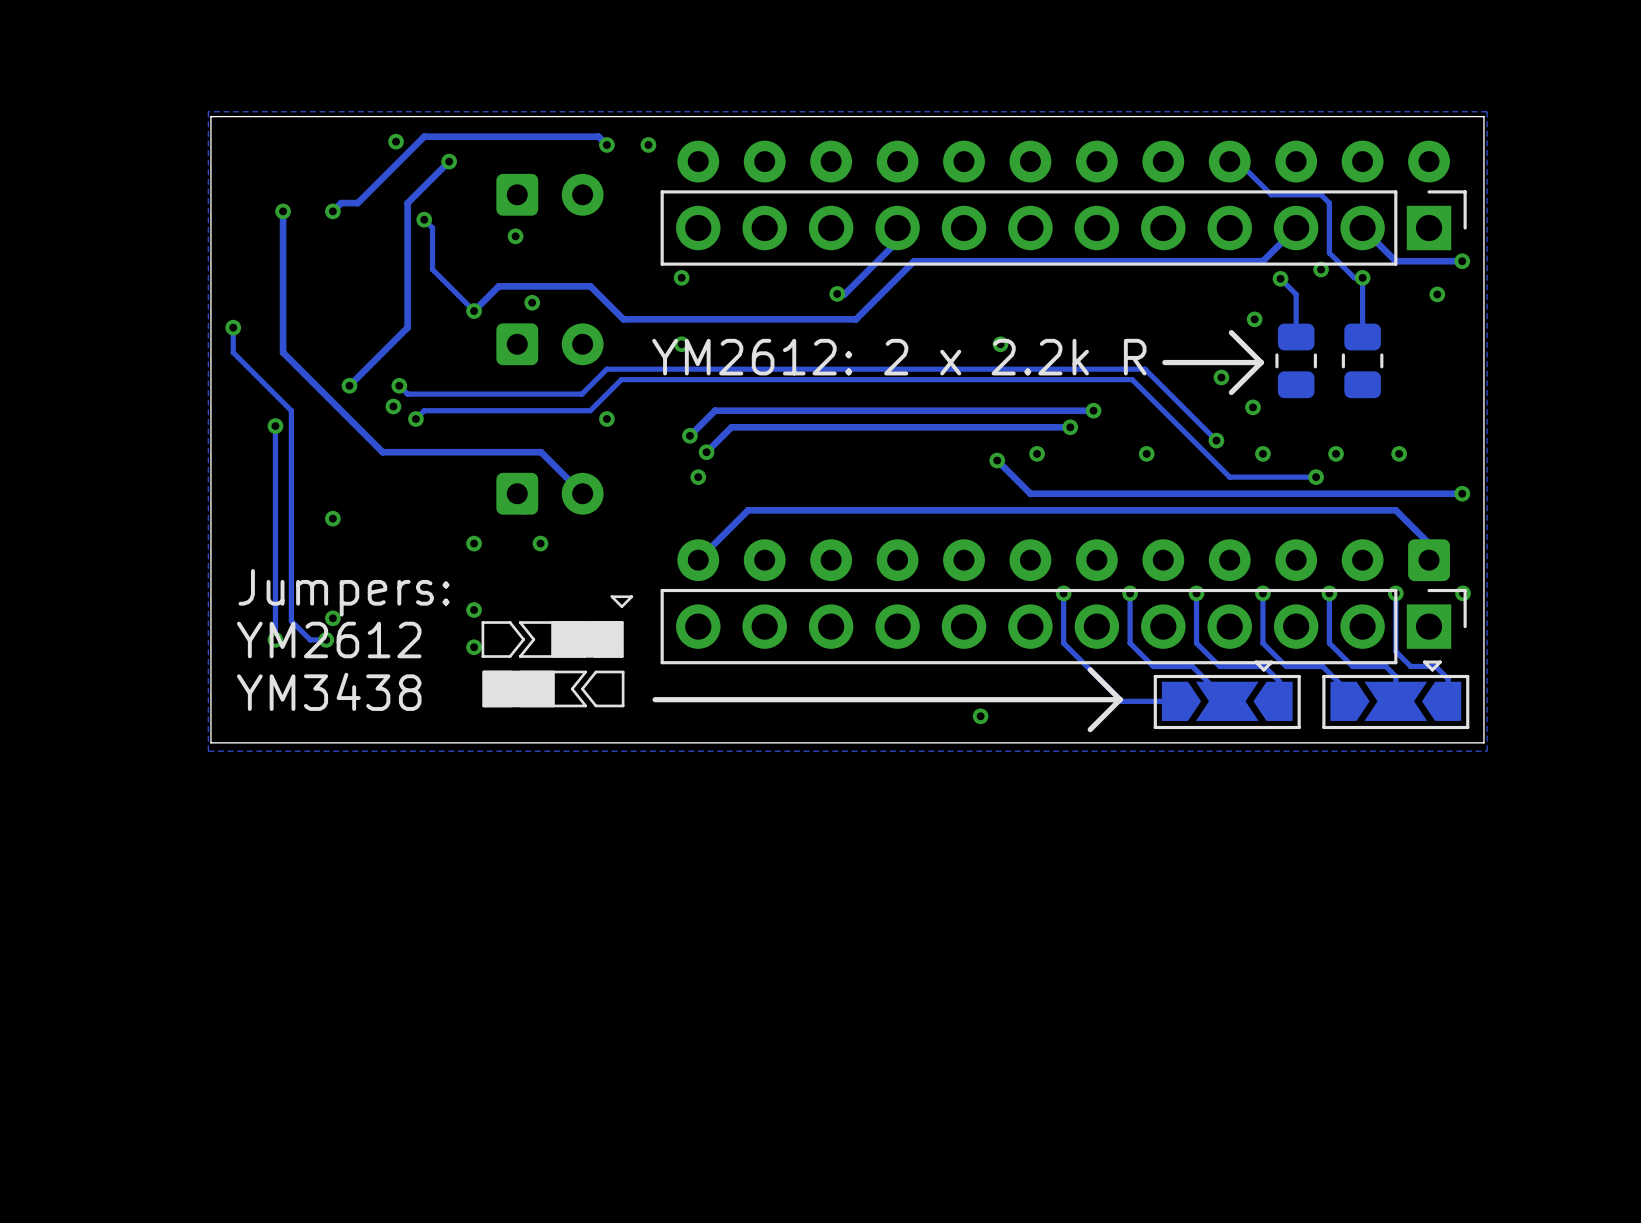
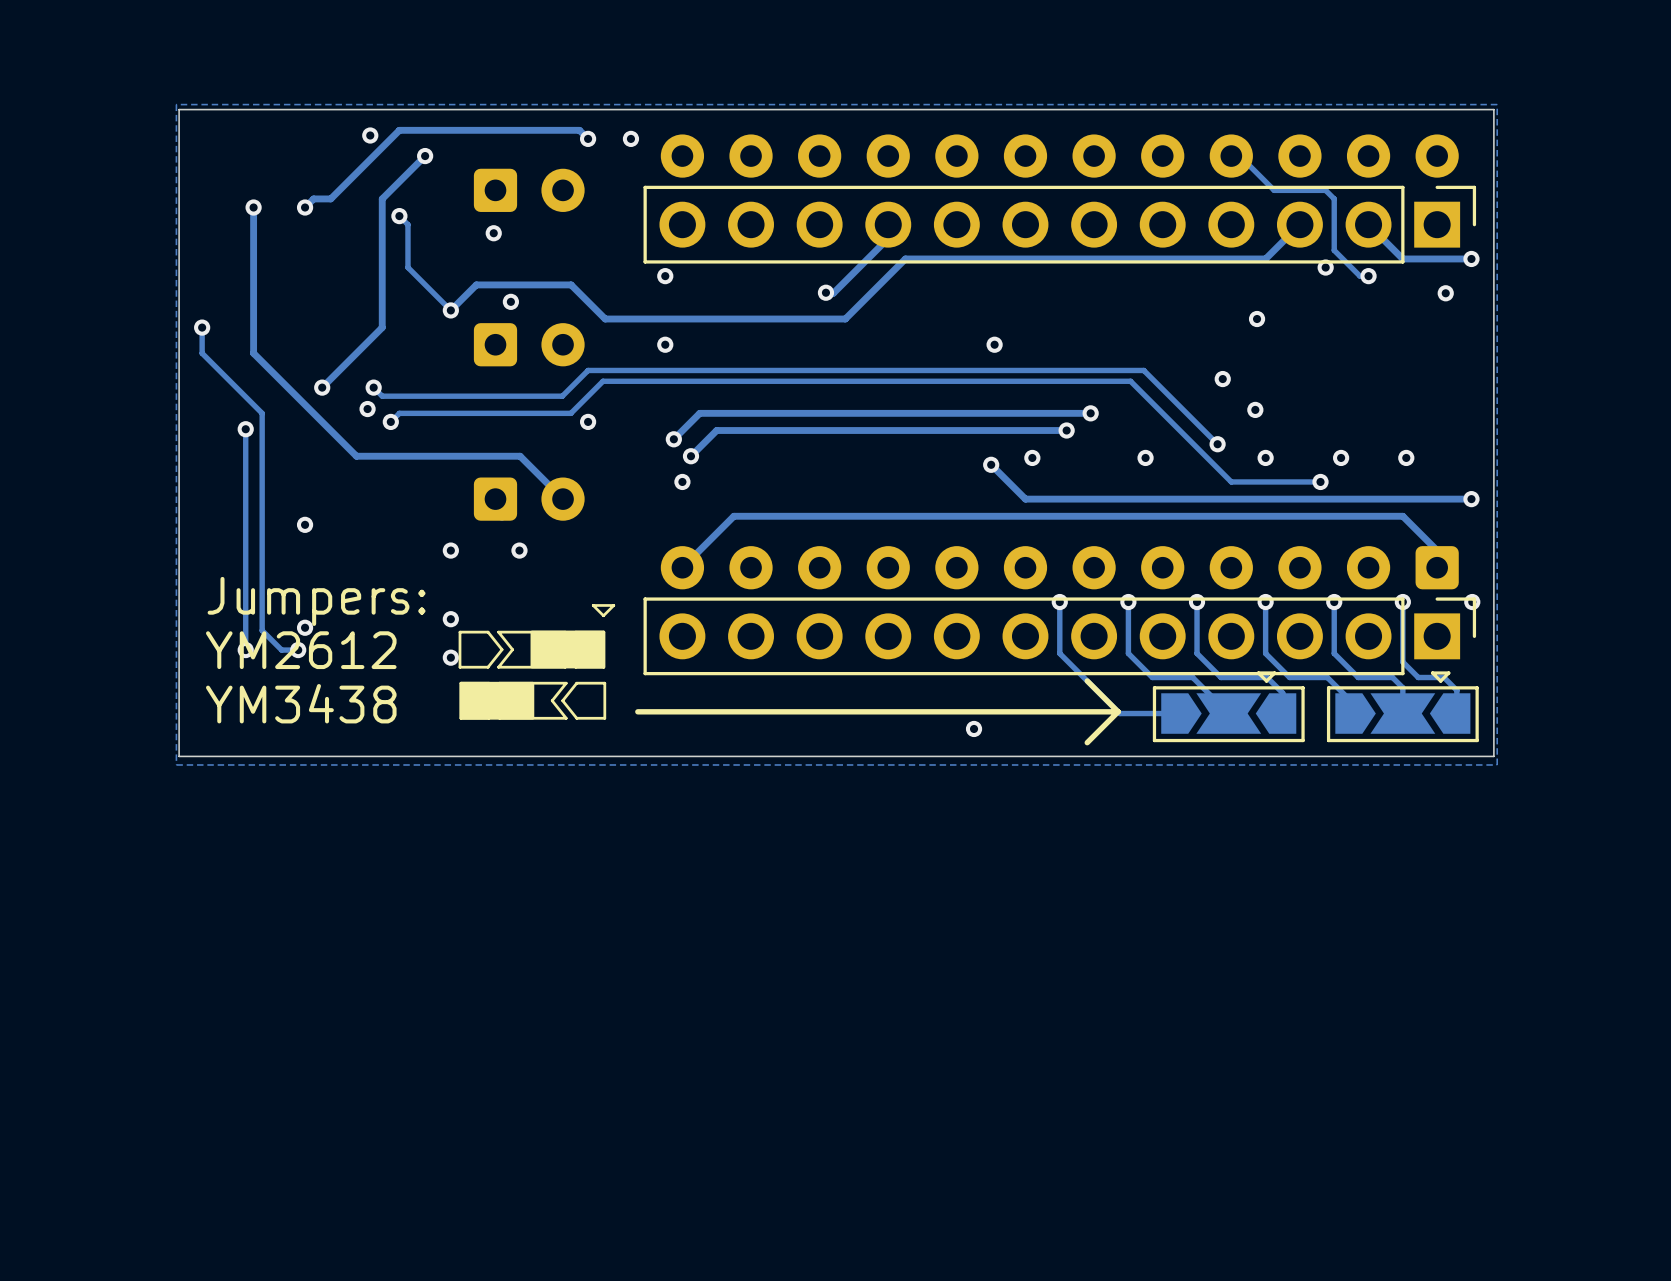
track: (1362, 277) (1362, 337) -> none
track: (1280, 278) (1296, 294) (1296, 337) -> none
via: (1280, 278) -> none
line: (1231, 332) (1261, 362) -> none
text: YM2612: 2 x 2.2k R (899, 357) -> none
part: (1296, 360) -> none
part: (1362, 360) -> none
line: (1261, 362) (1231, 392) -> none
line: (1261, 362) (1164, 362) -> none

